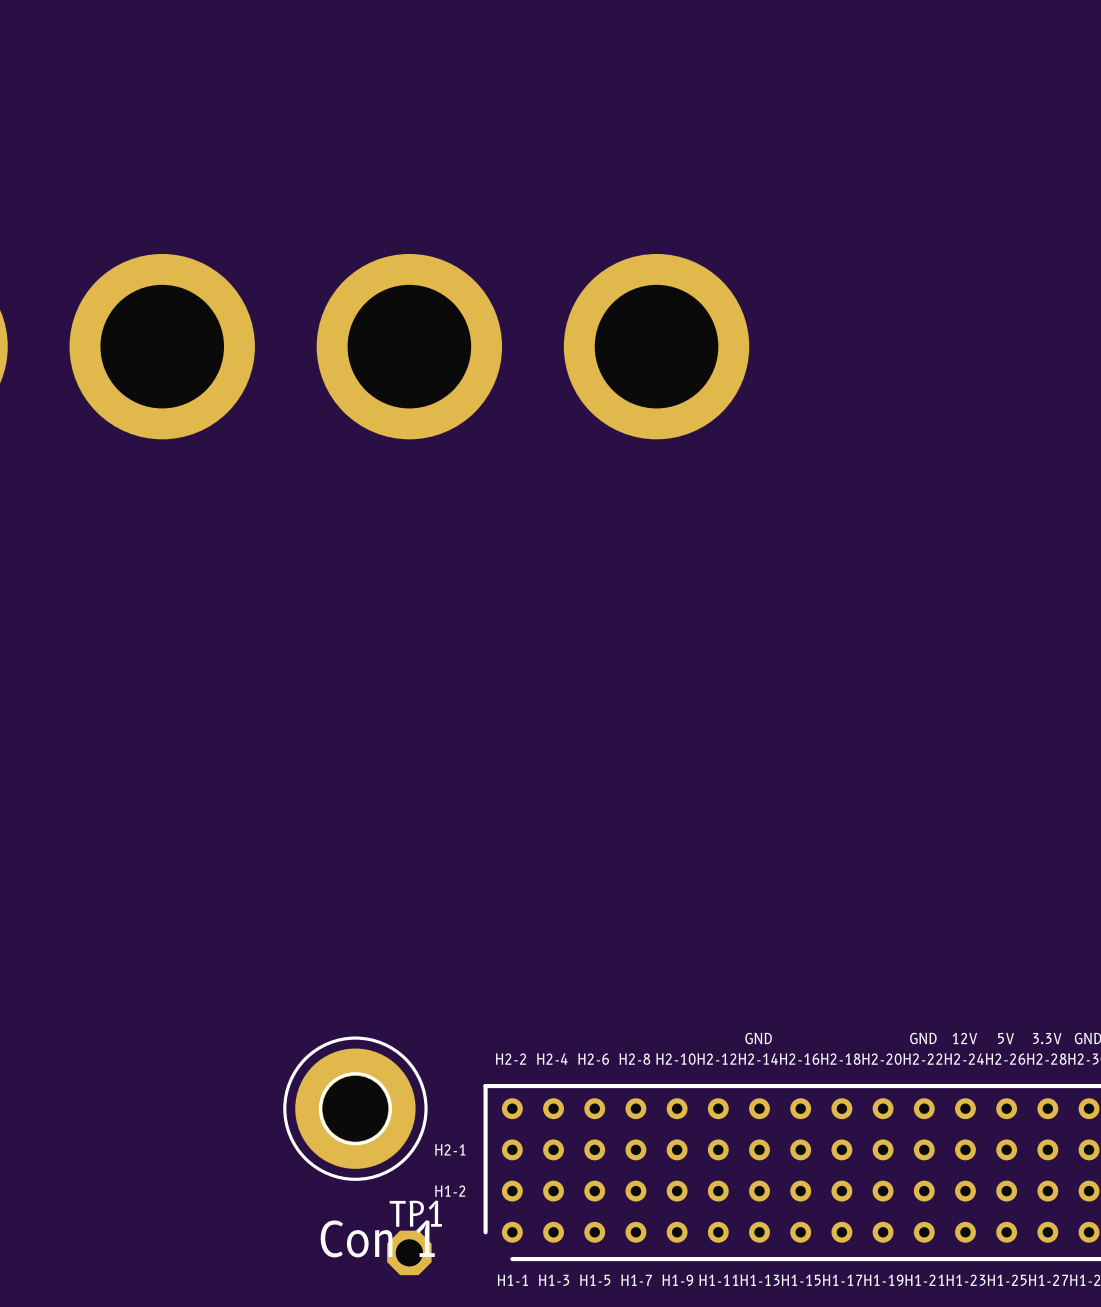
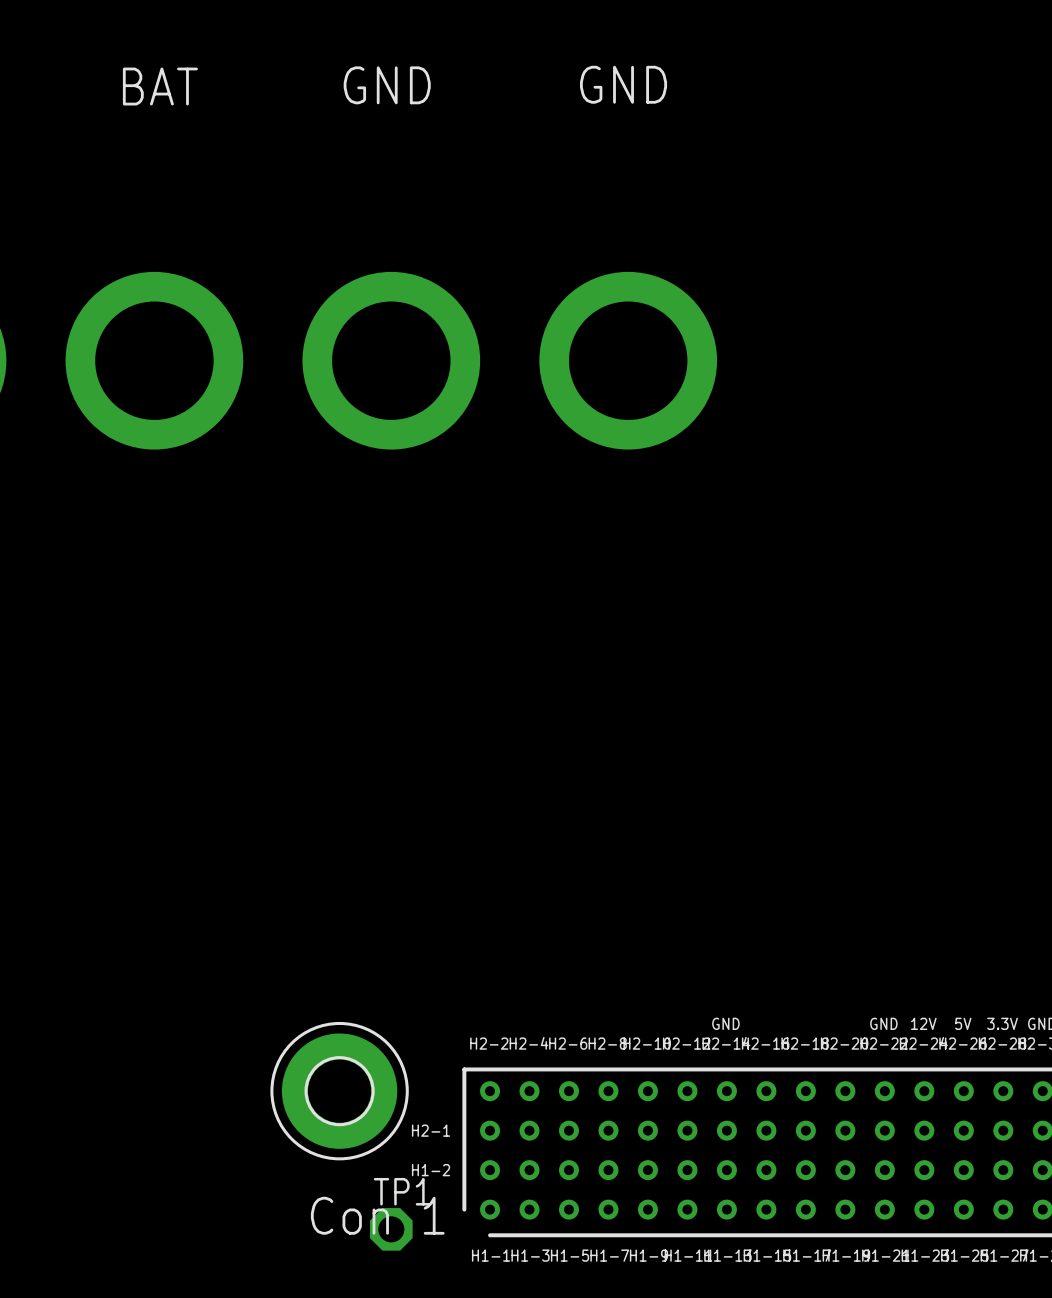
text: none -> GND (623, 84)
text: none -> GND (387, 85)
text: none -> BAT (160, 86)

